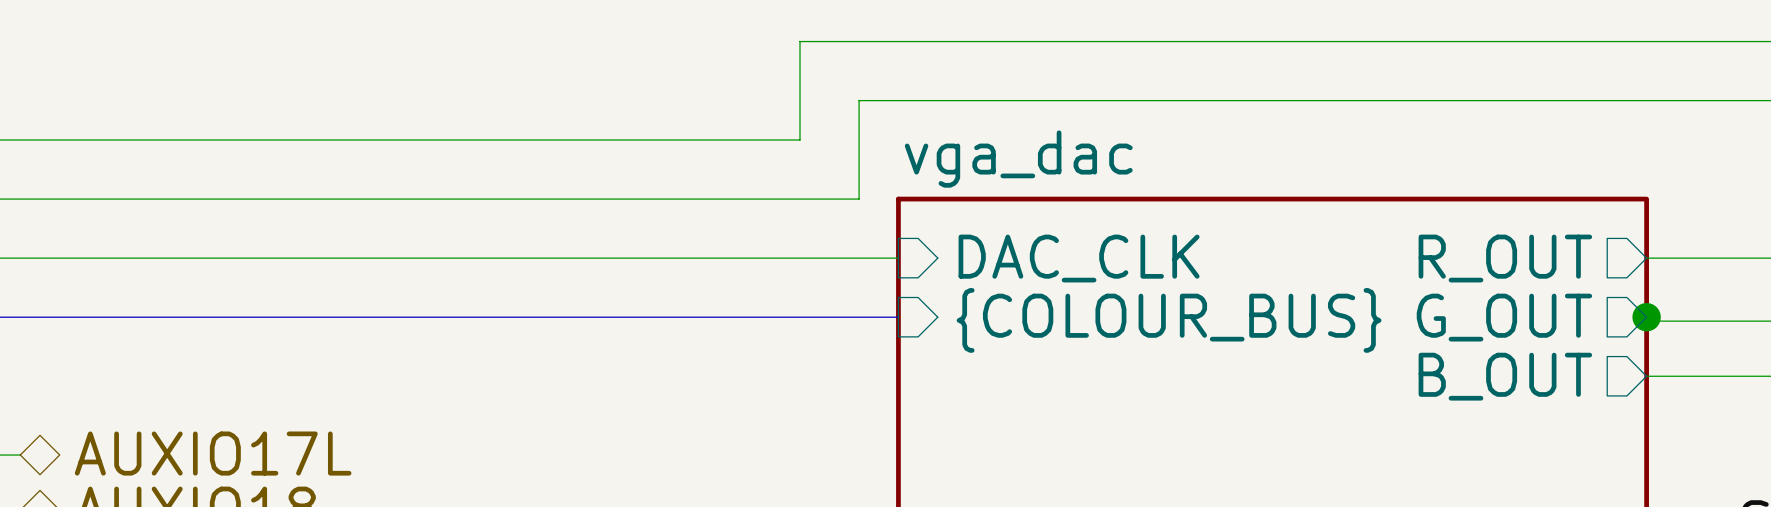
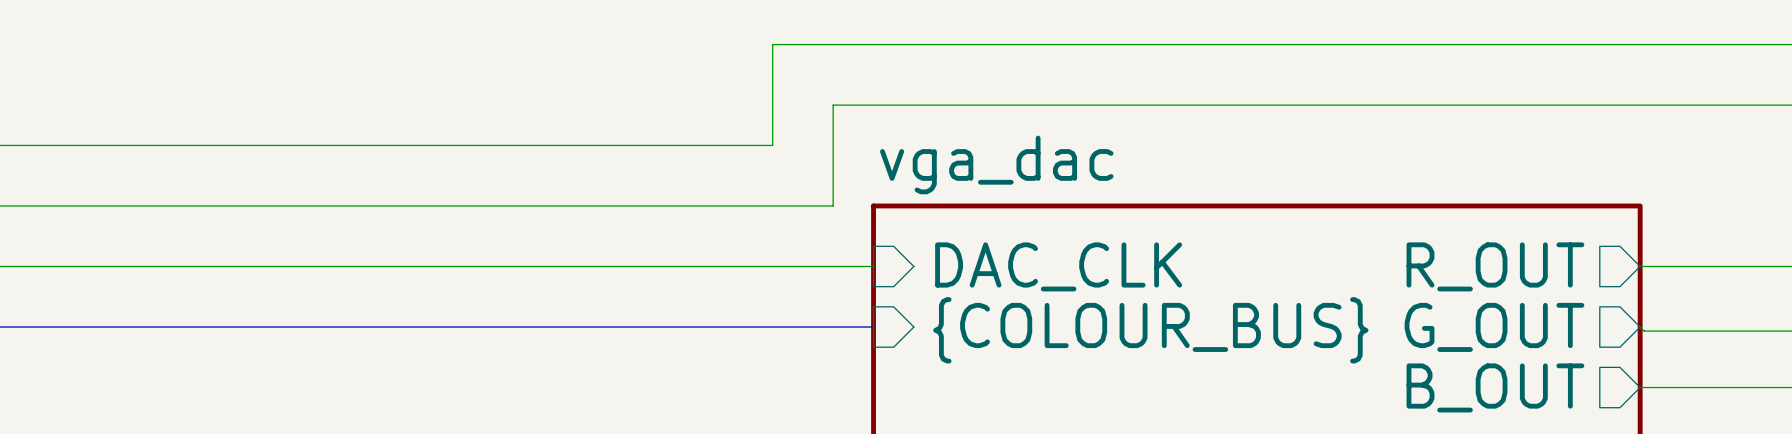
junction: (1646, 317) -> none

